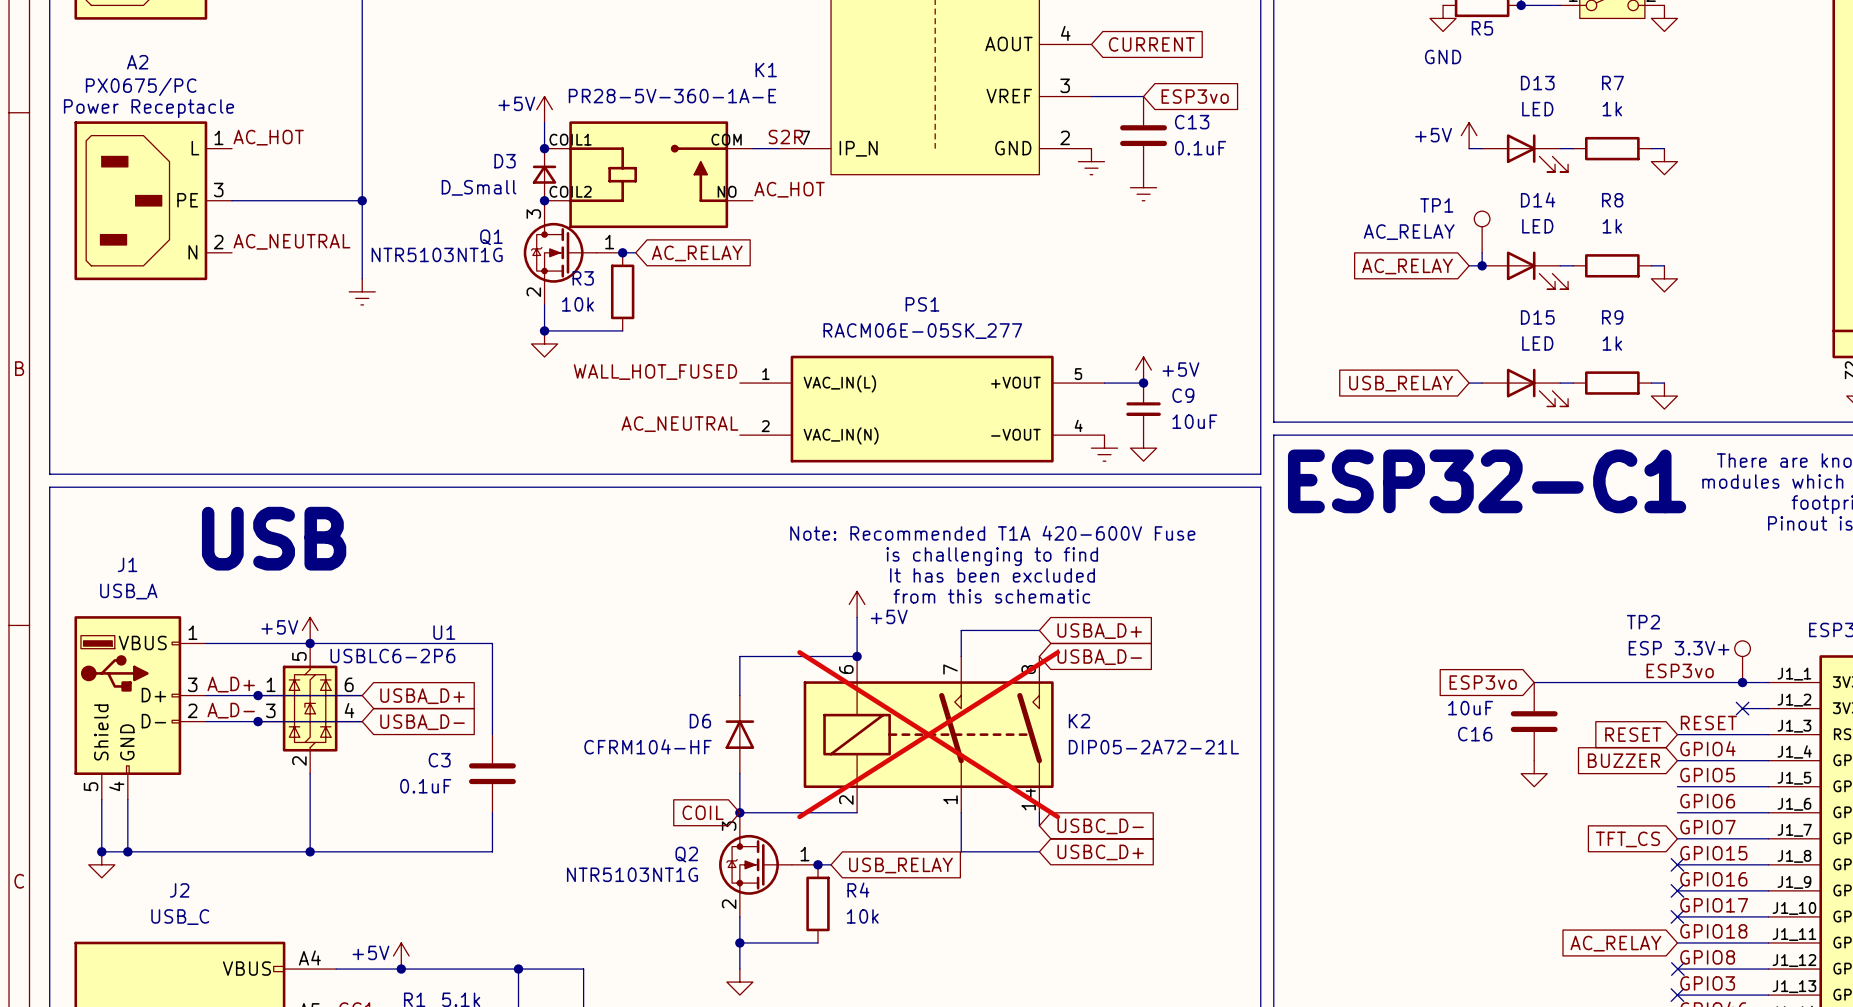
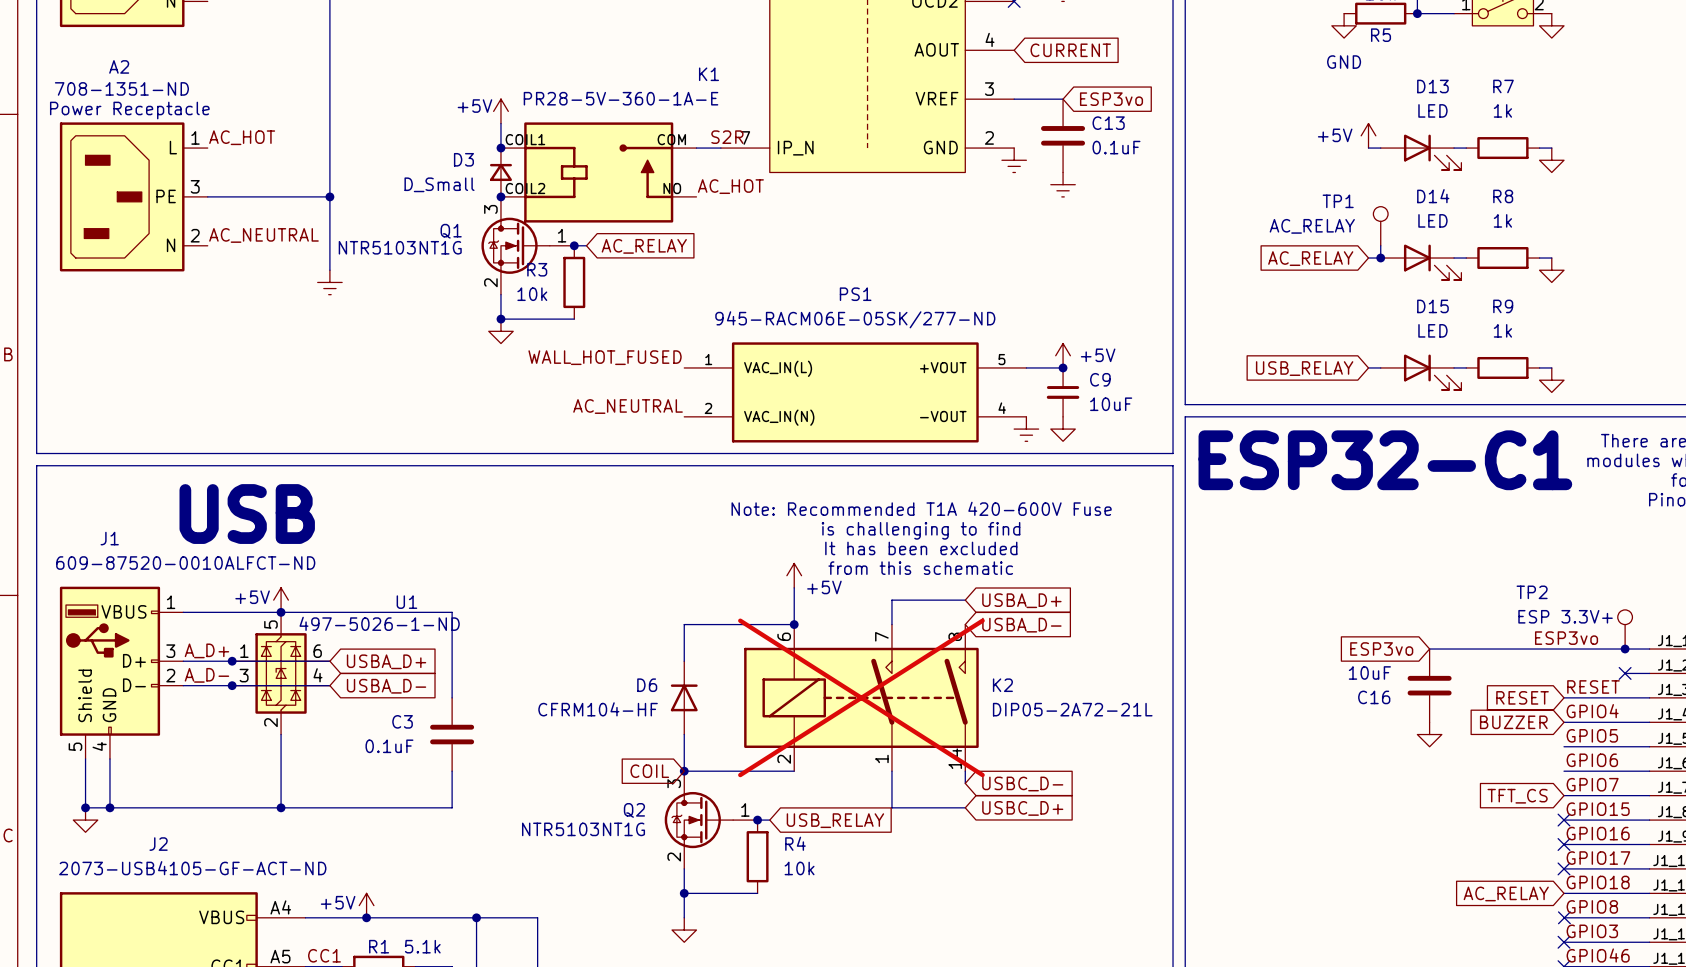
A2 value: PX0675/PC (141, 86) -> 708-1351-ND (121, 88)
PS1 value: RACM06E-05SK_277 (922, 331) -> 945-RACM06E-05SK/277-ND (855, 319)
J1 value: USB_A (128, 591) -> 609-87520-0010ALFCT-ND (185, 563)
U1 value: USBLC6-2P6 (392, 656) -> 497-5026-1-ND (379, 623)
J2 value: USB_C (180, 917) -> 2073-USB4105-GF-ACT-ND (192, 868)

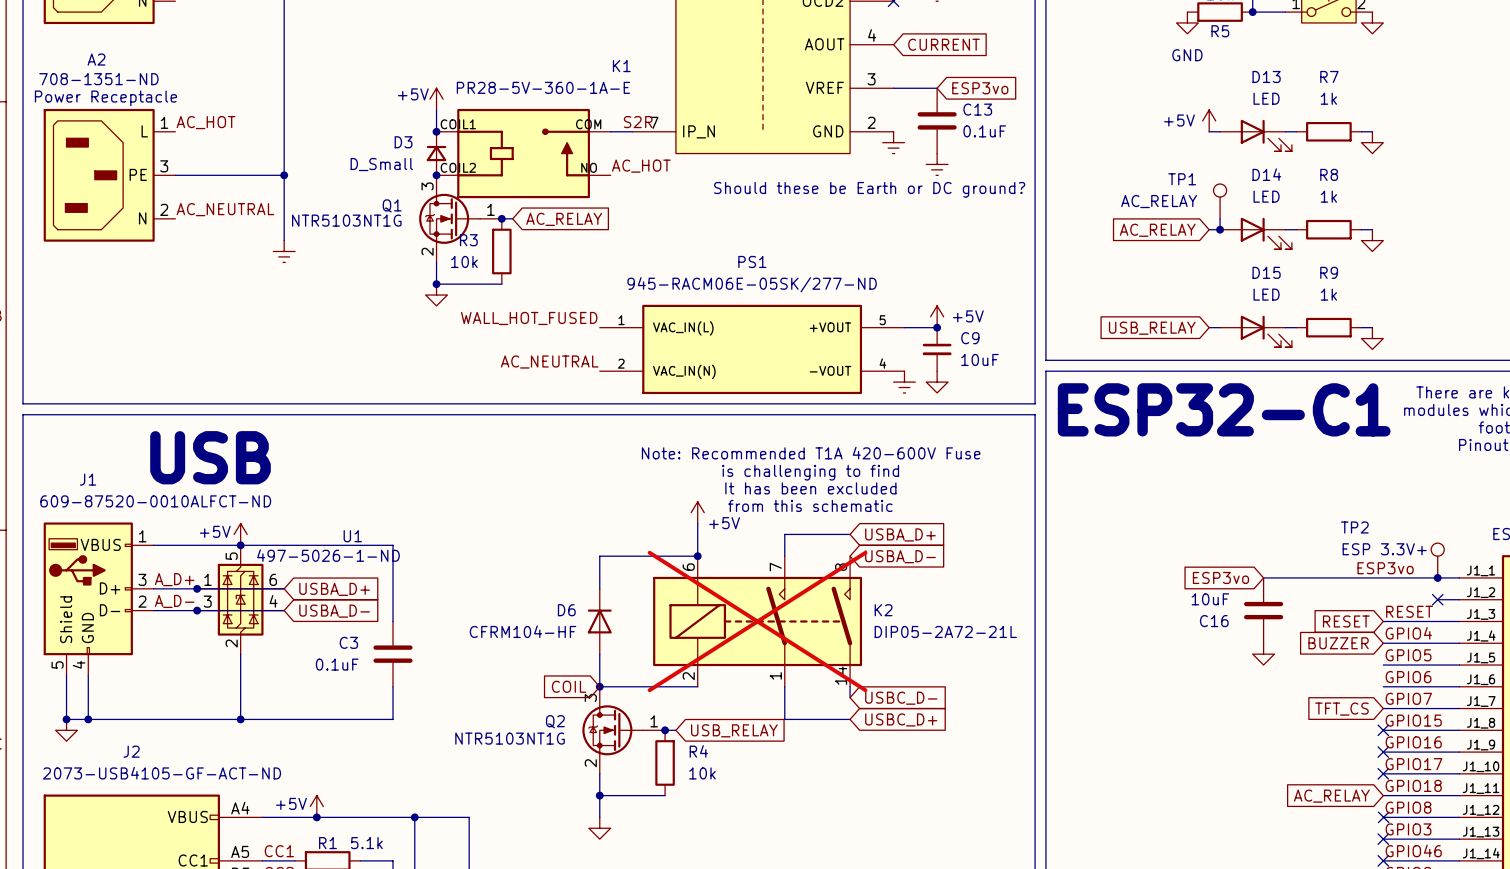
text: none -> Should these be Earth or DC ground? (869, 189)

